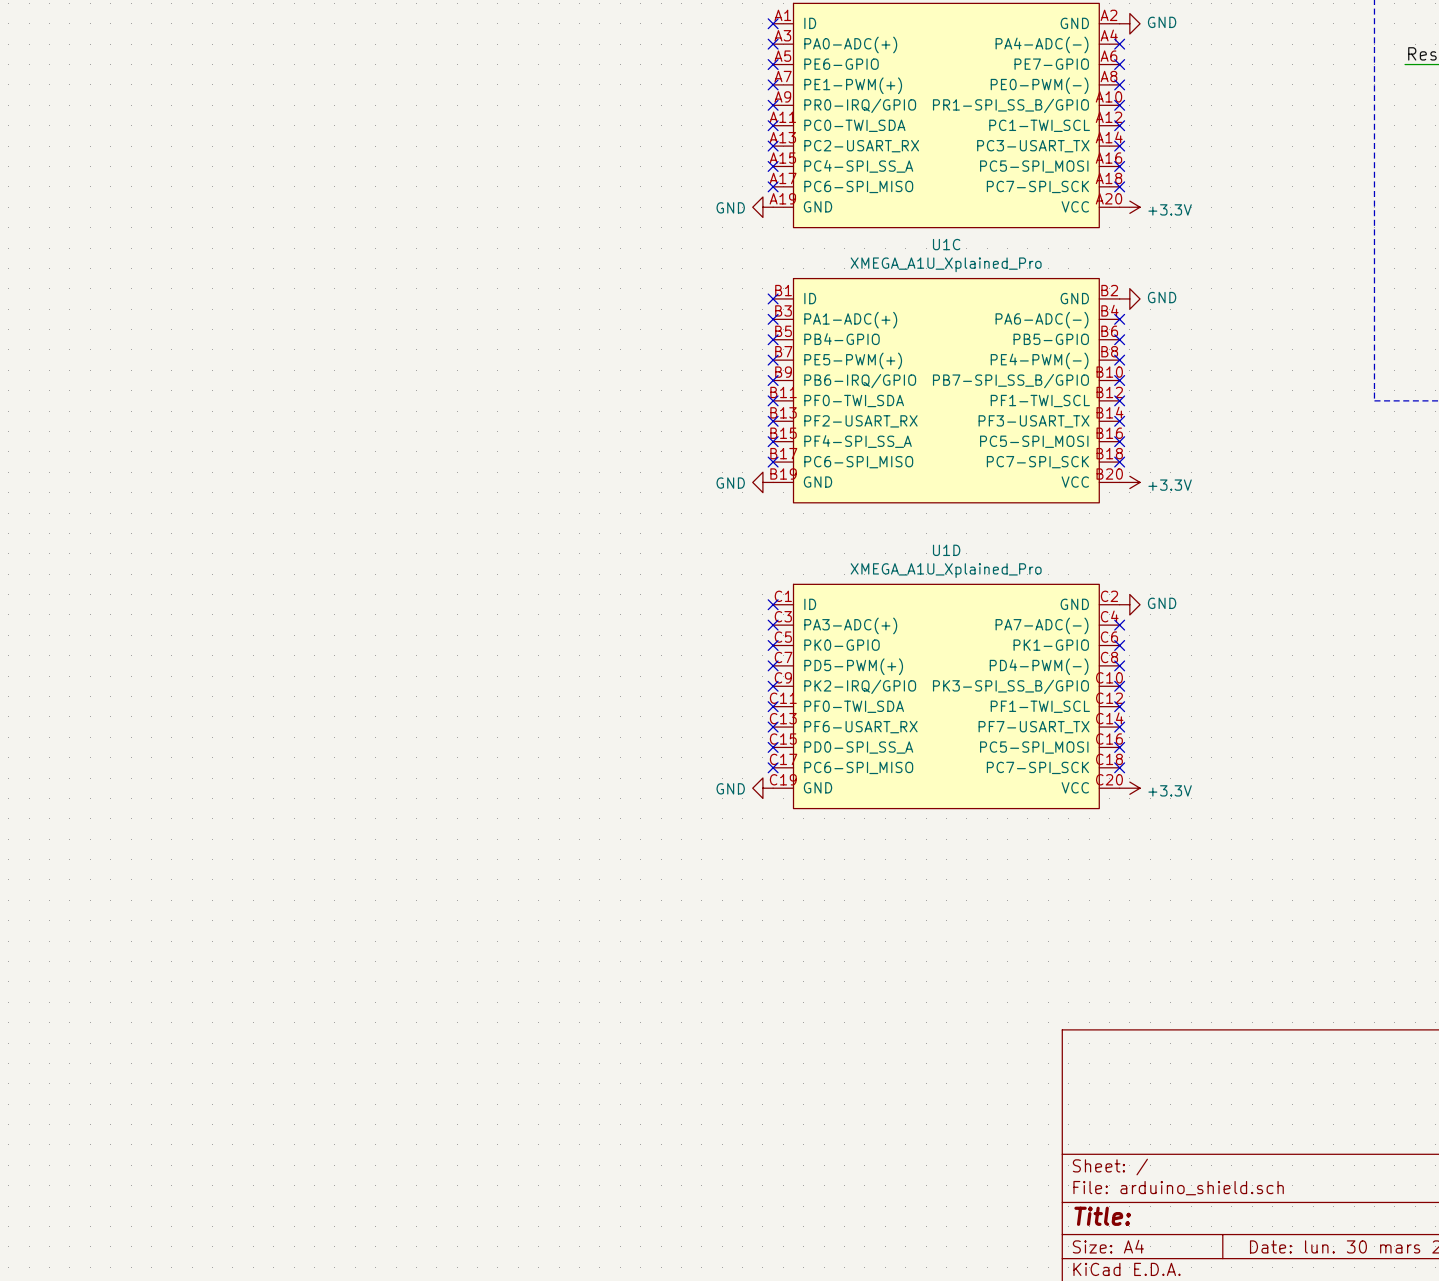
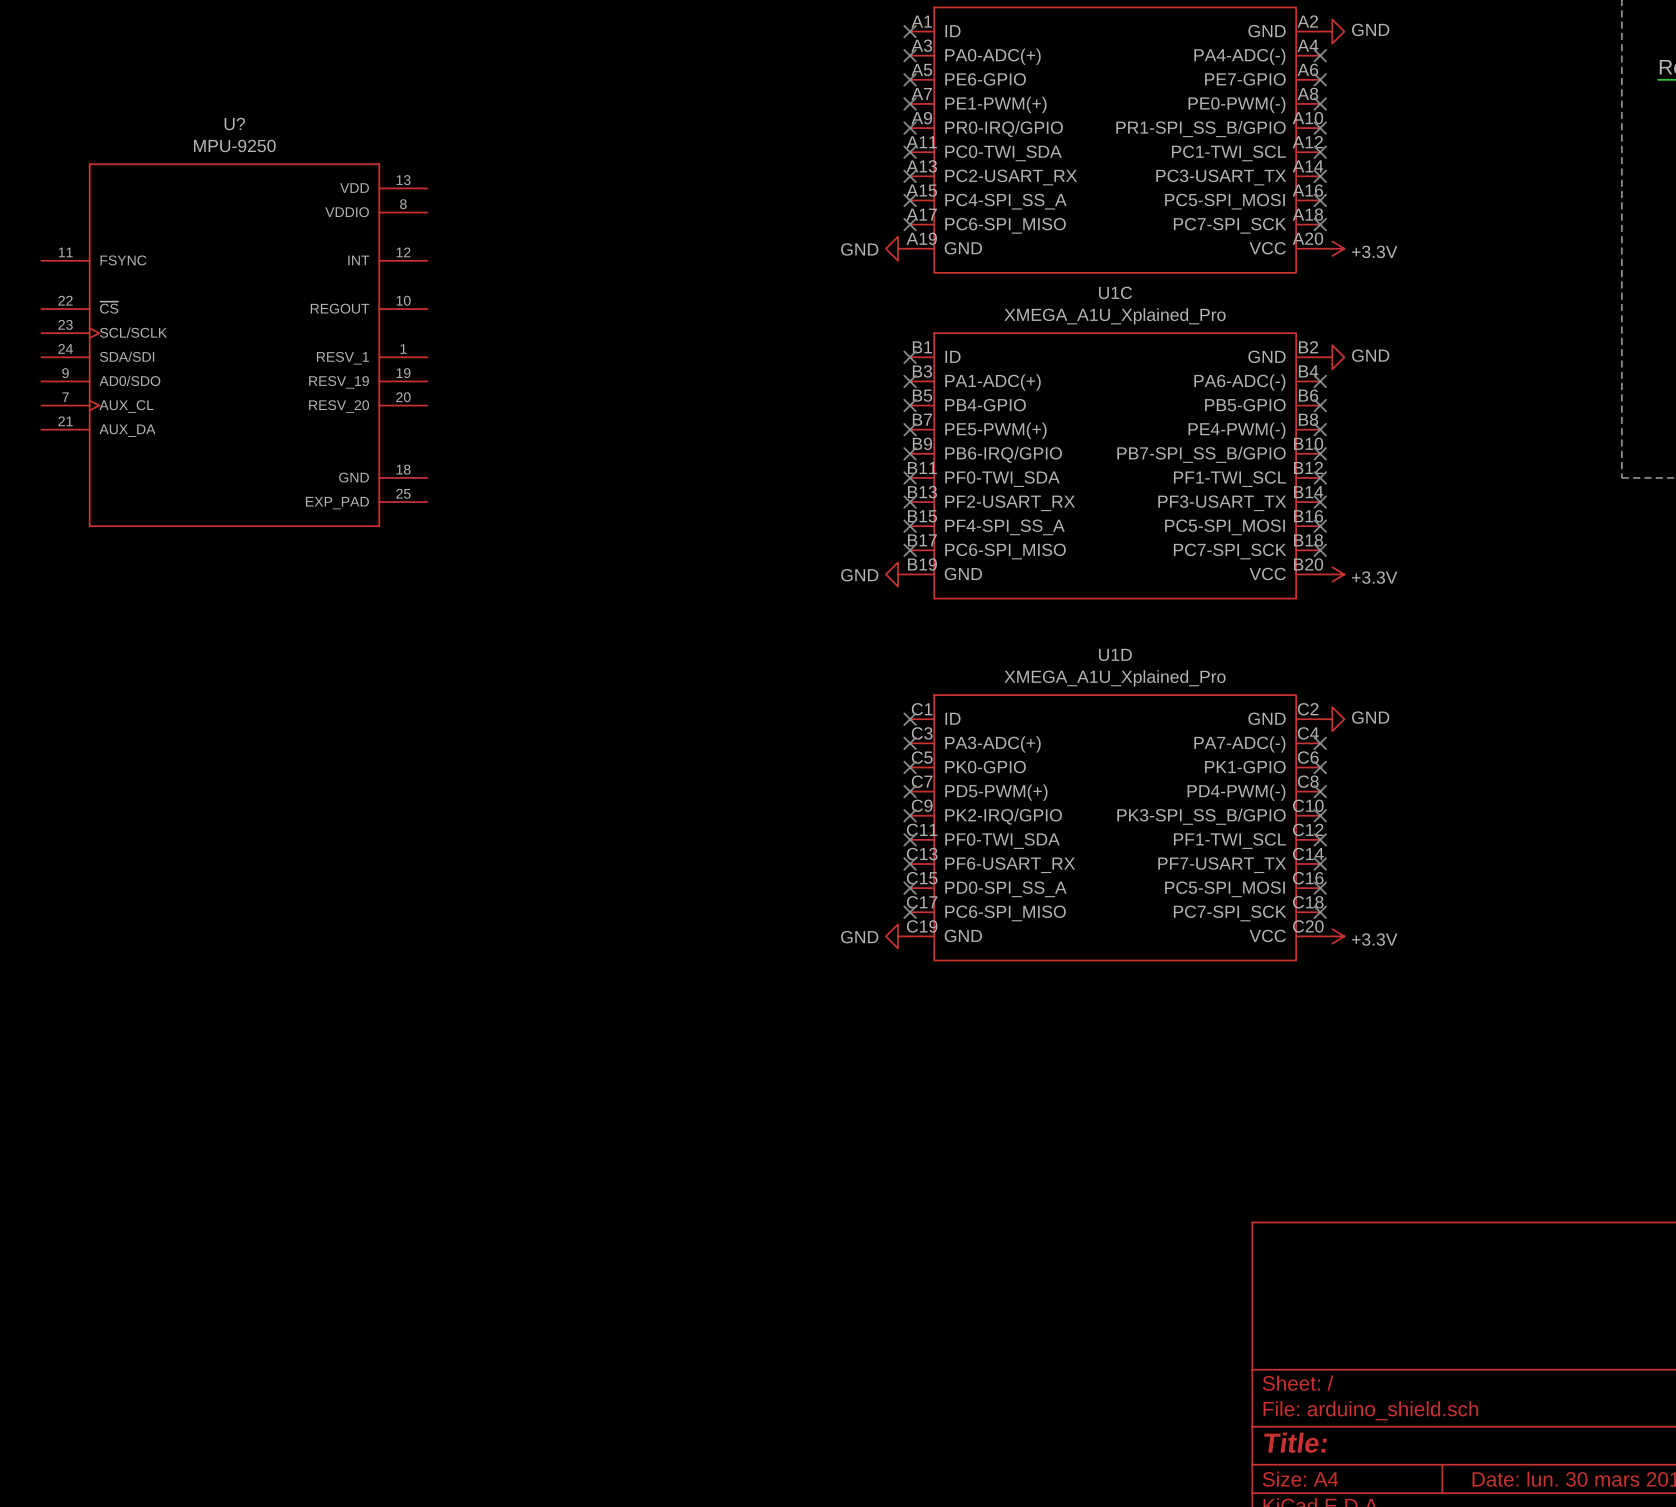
U?: none -> MPU-9250 (234, 345)

